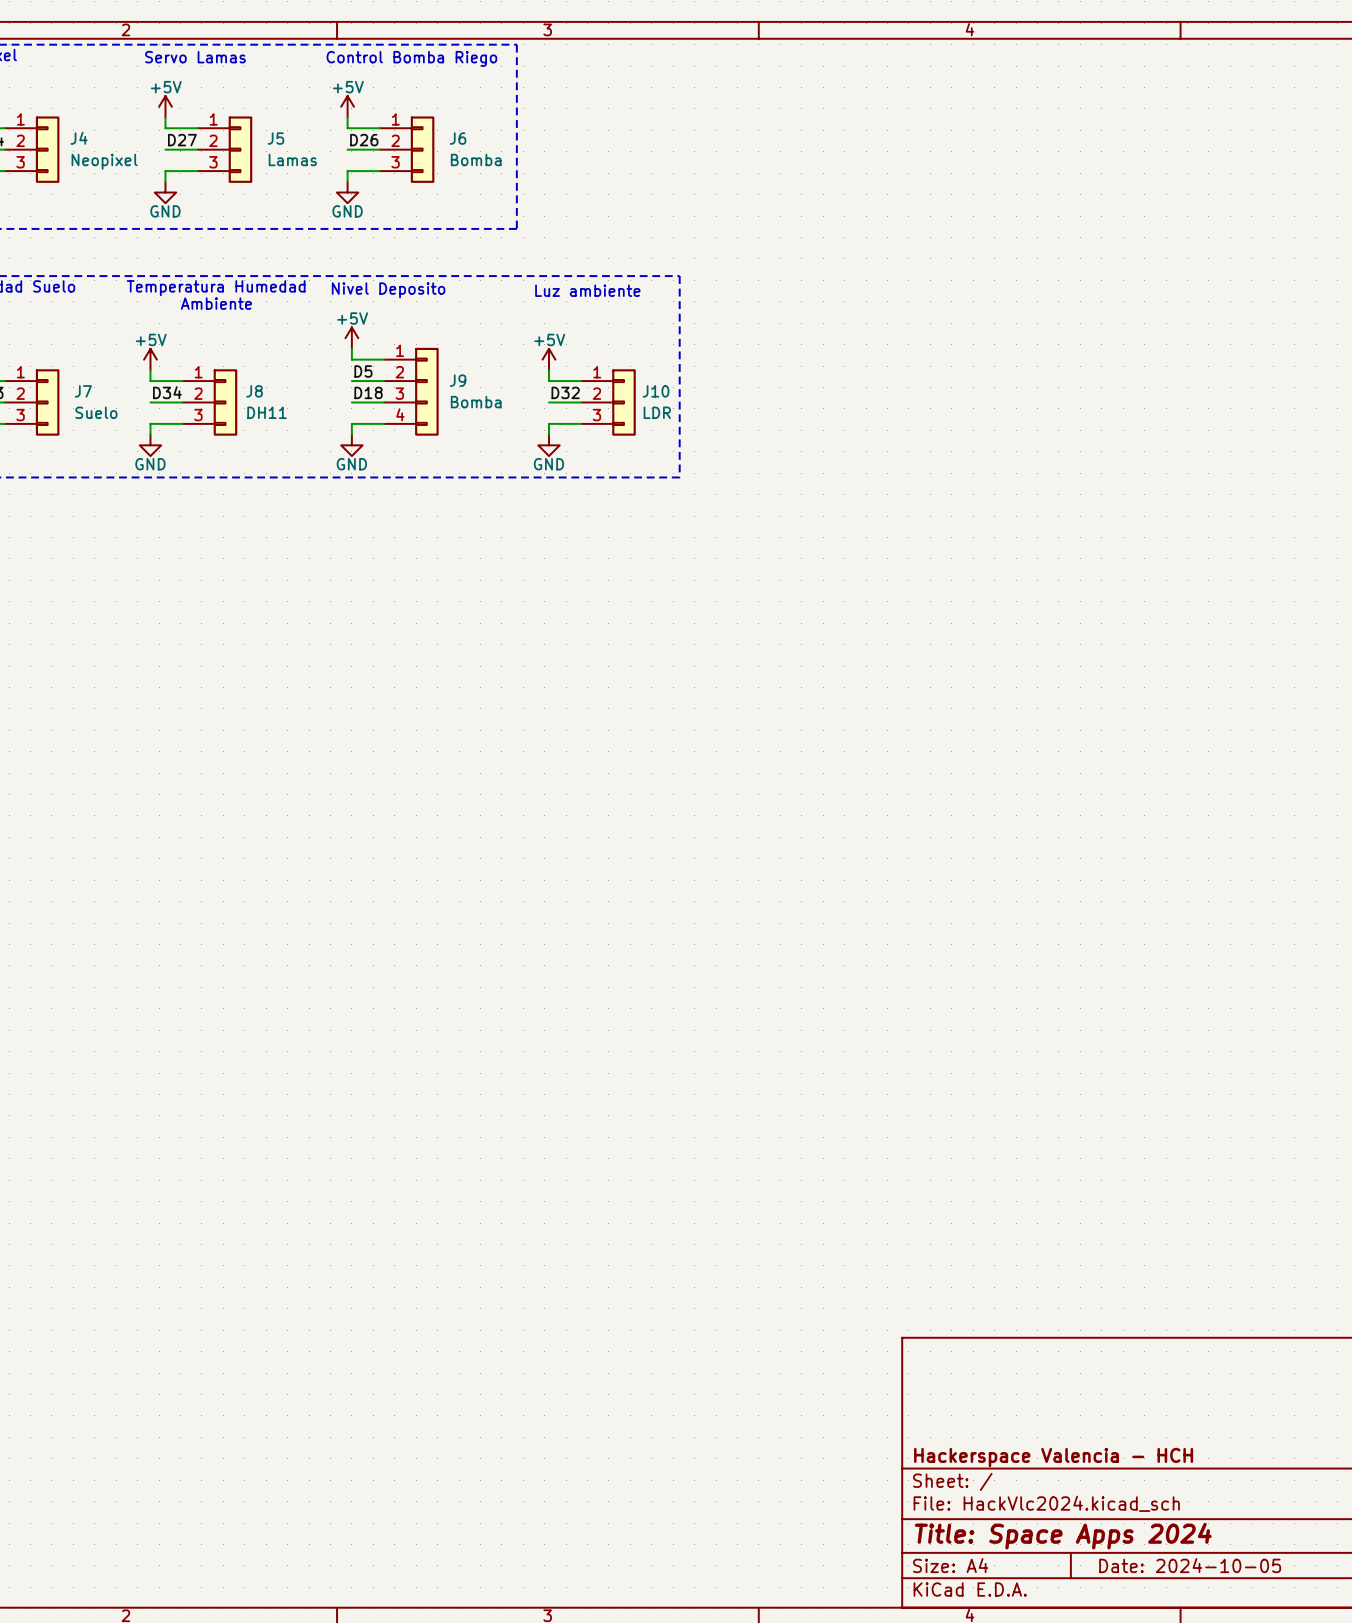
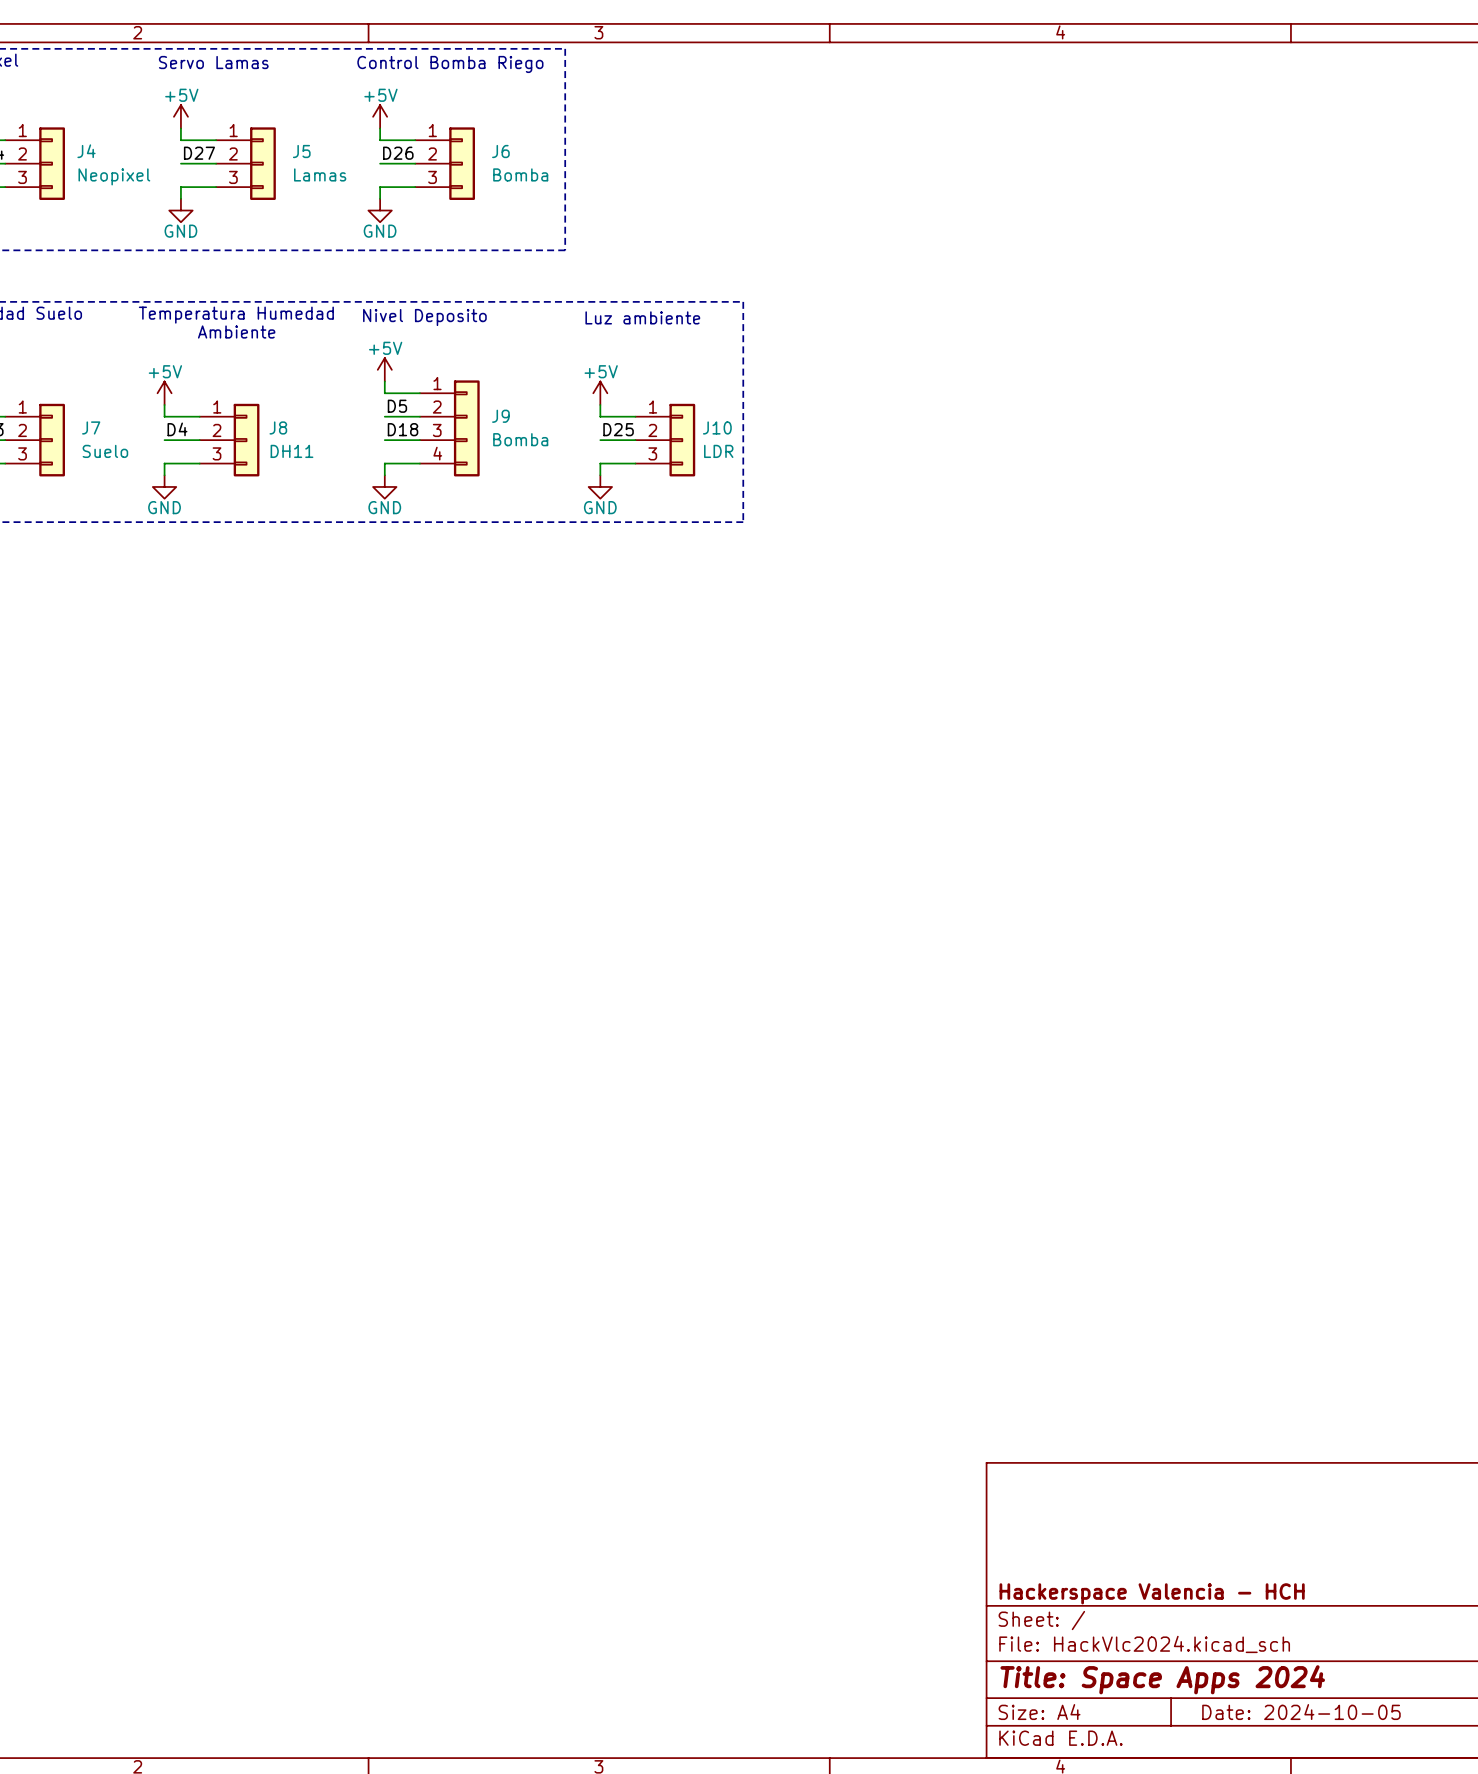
label: D34 (167, 392) -> D4 (177, 429)
label: D32 (565, 392) -> D25 (618, 429)

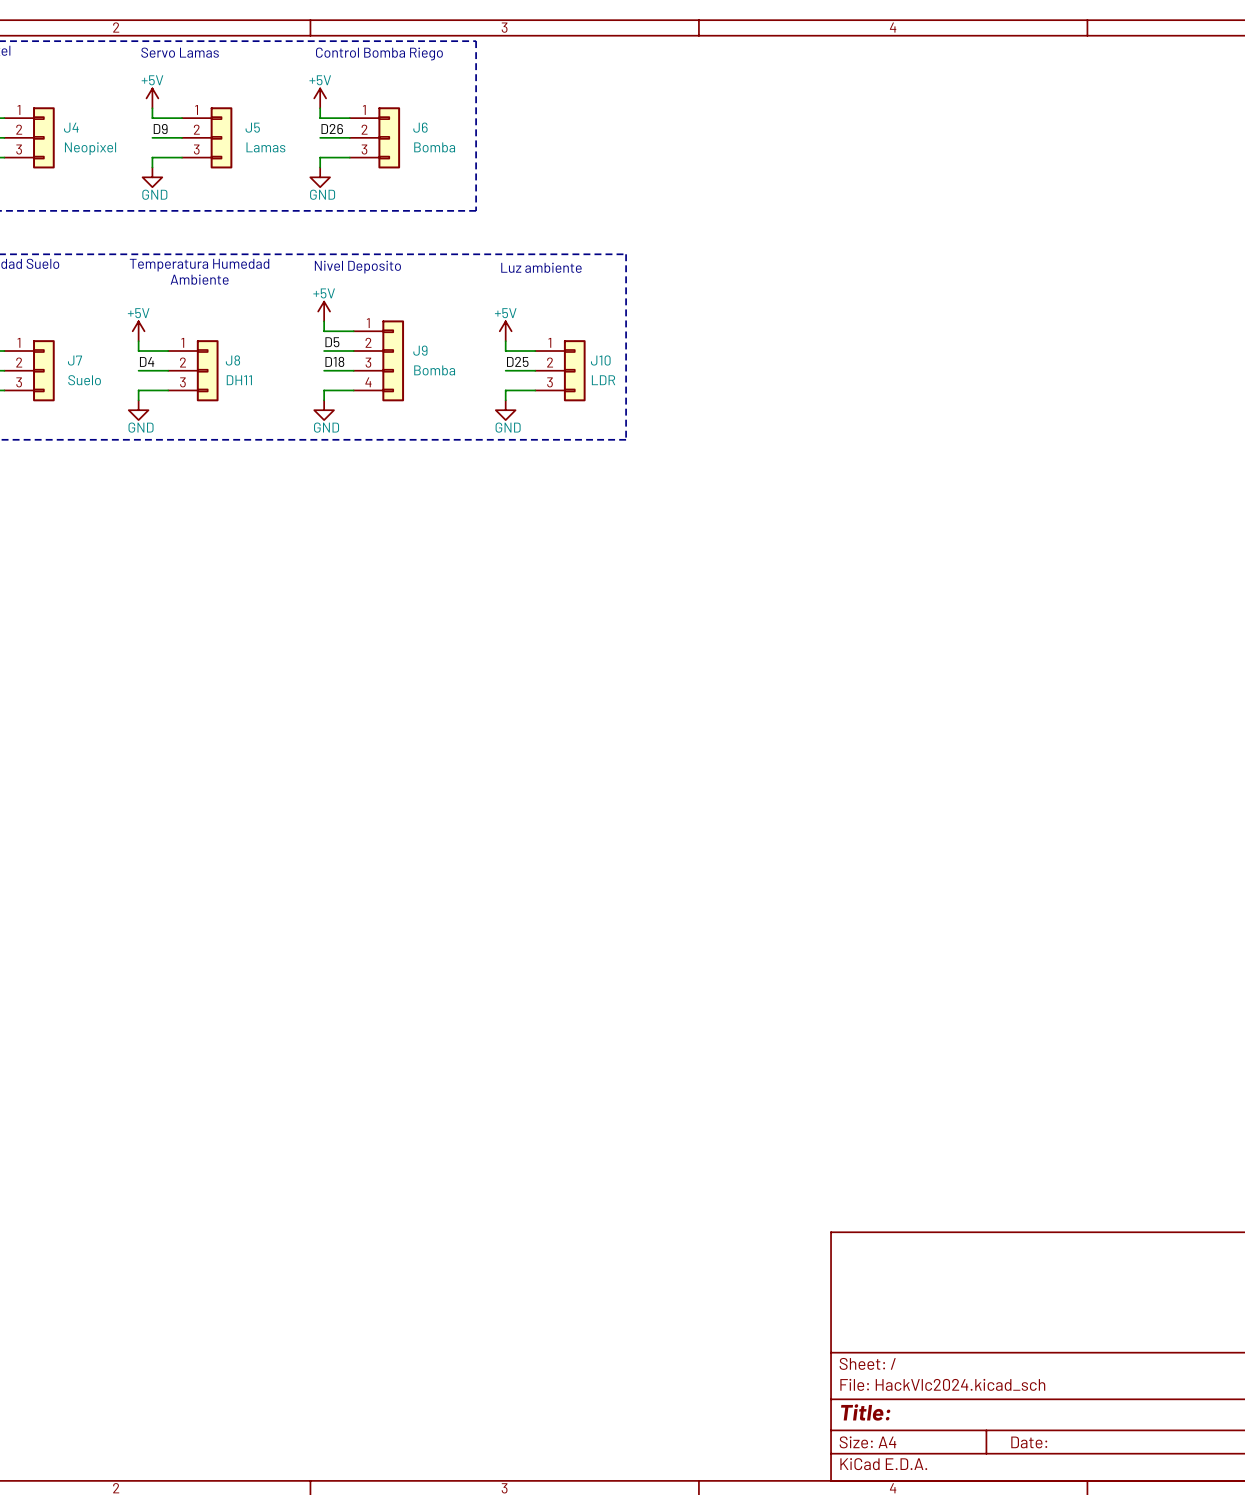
label: D27 (199, 153) -> D9 (160, 129)
title block: Hackerspace Valencia - HCH (1152, 1593) -> none
title block: Title: Space Apps 2024 (1162, 1679) -> Title: (865, 1412)
title block: Date: 2024-10-05 (1301, 1712) -> Date: (1029, 1442)

